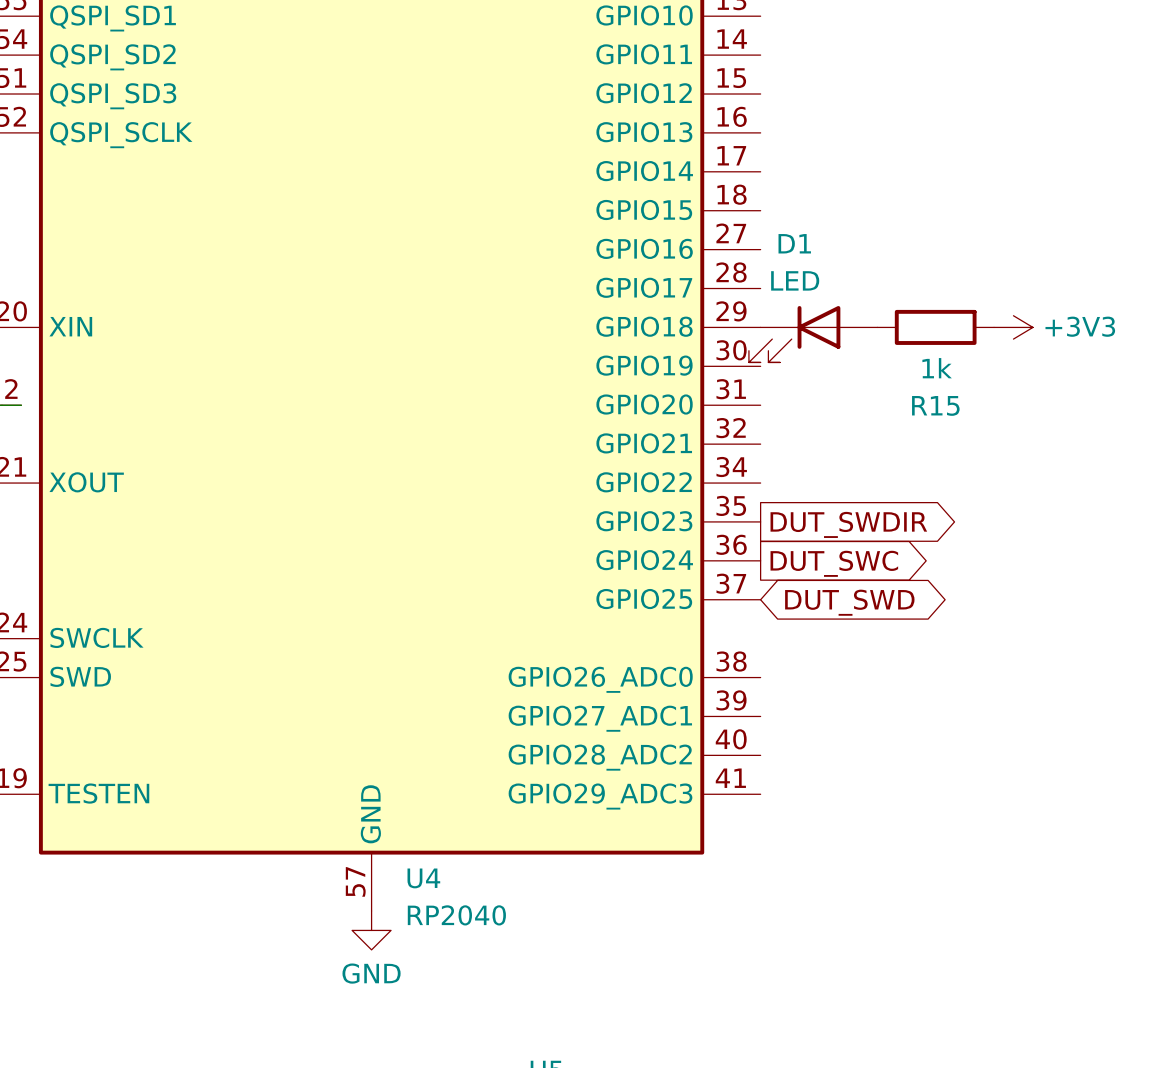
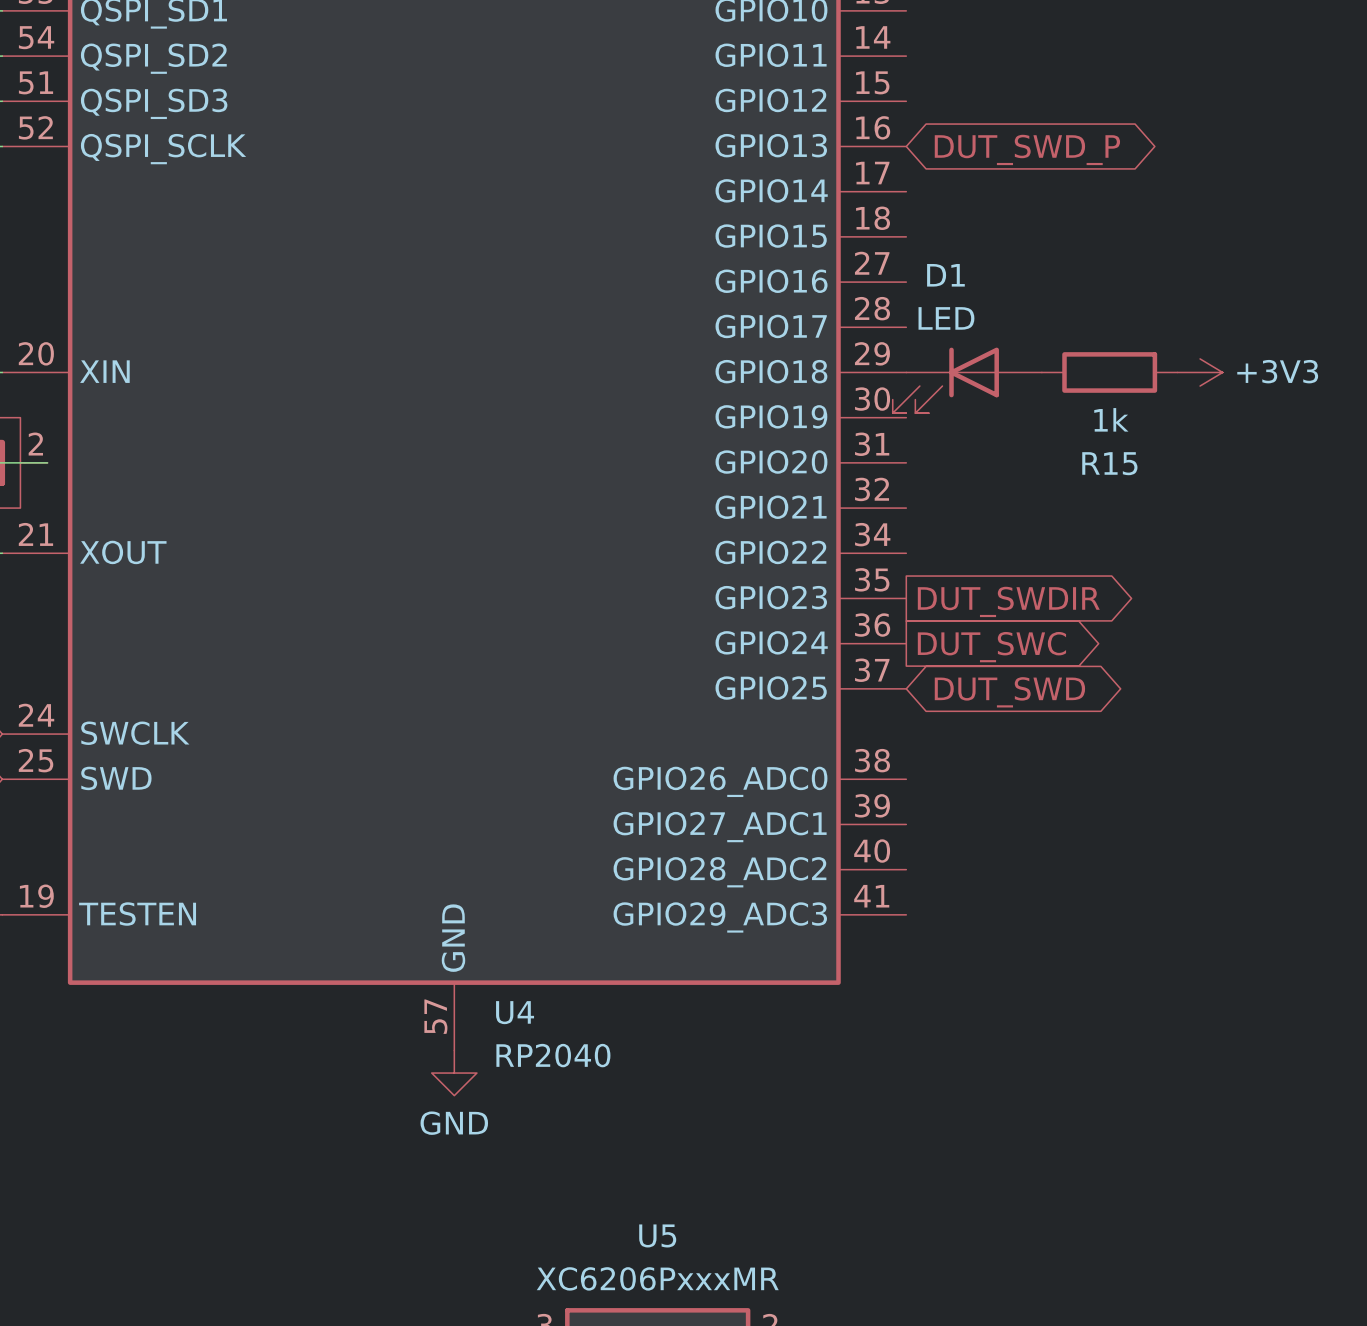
global label: none -> DUT_SWD_P (1027, 149)

